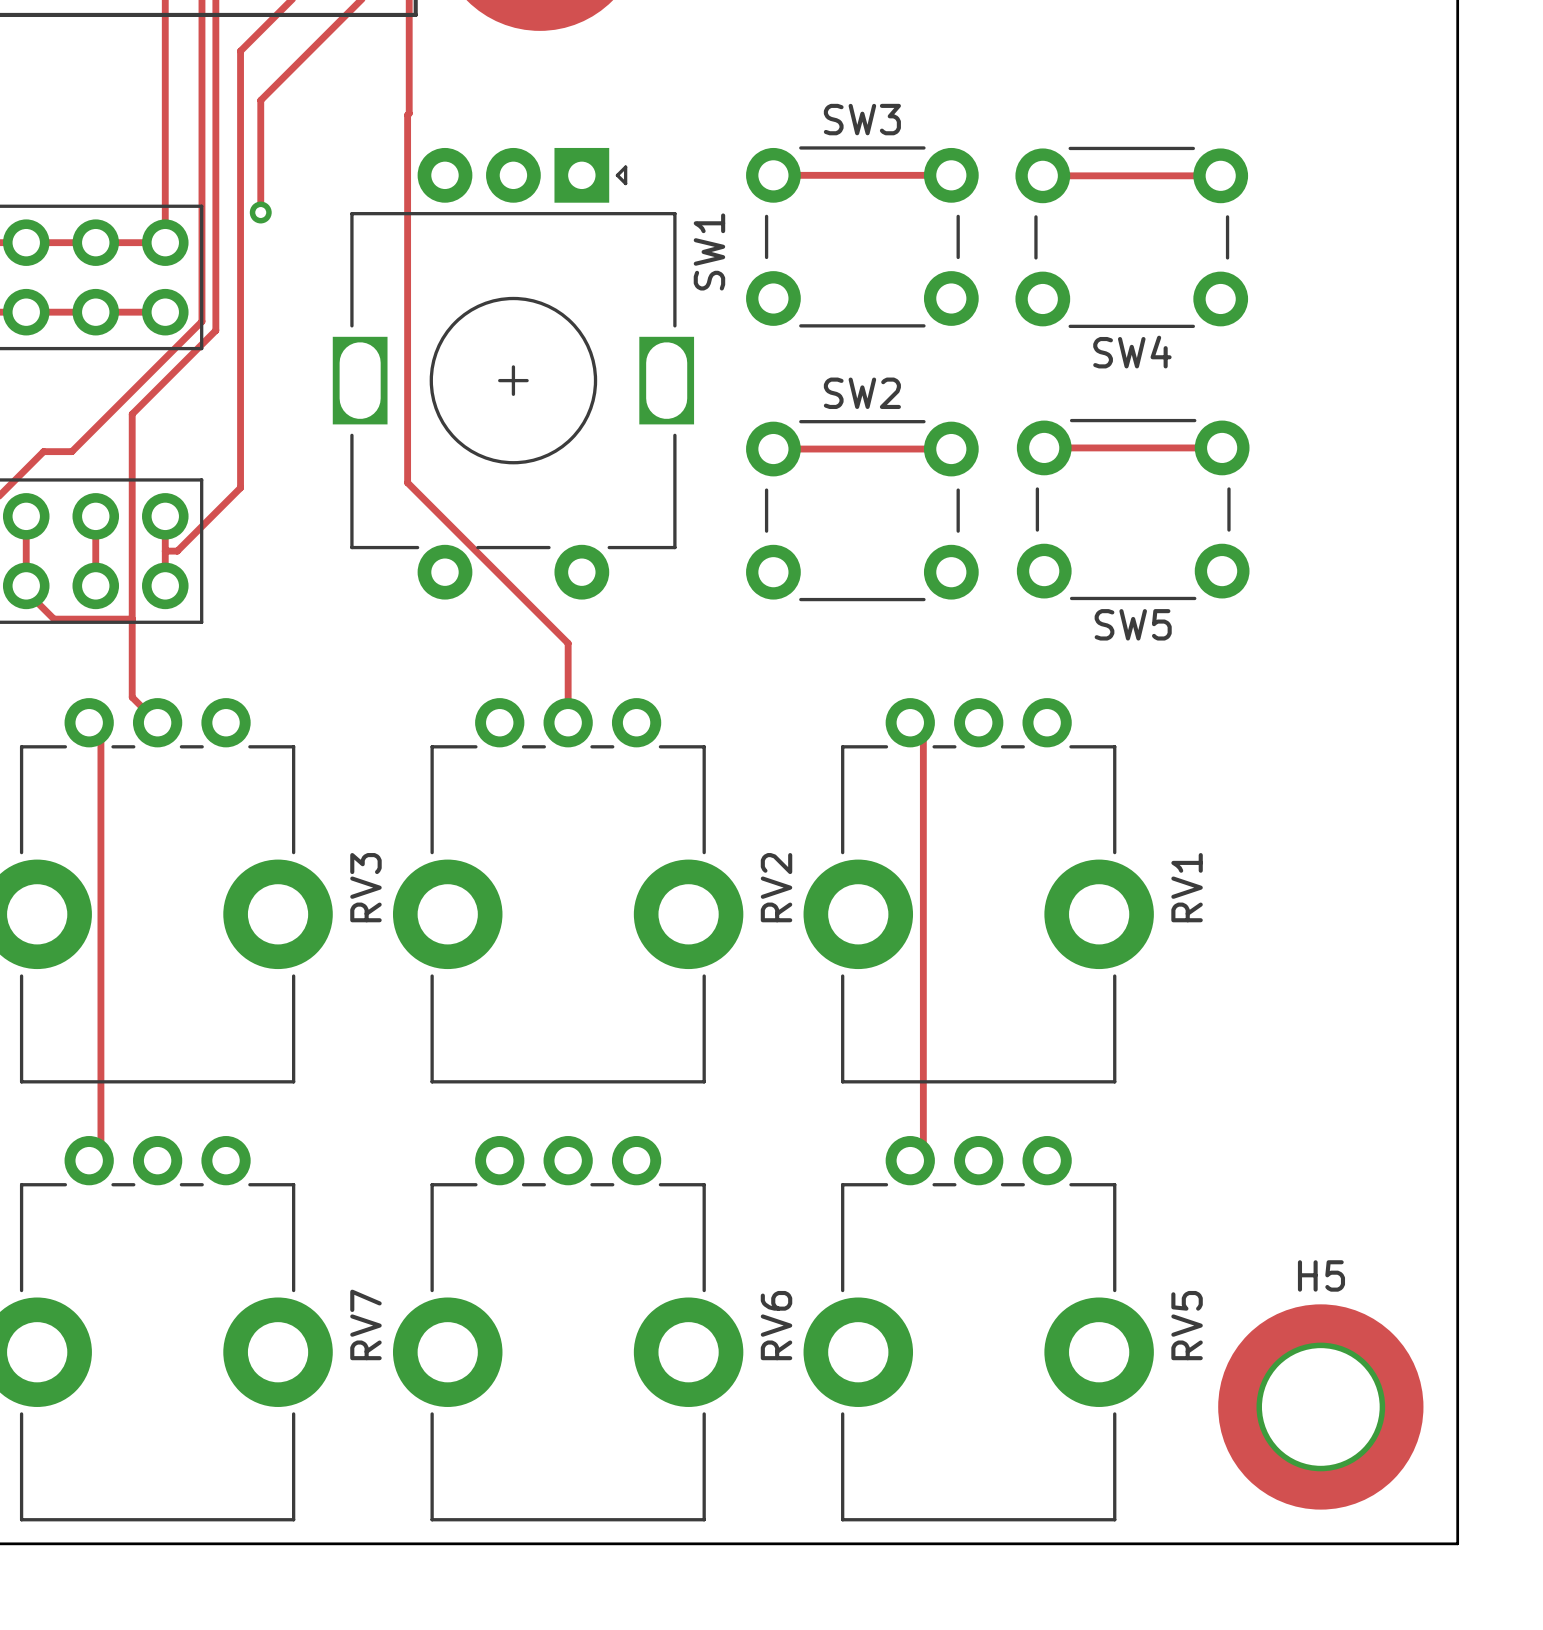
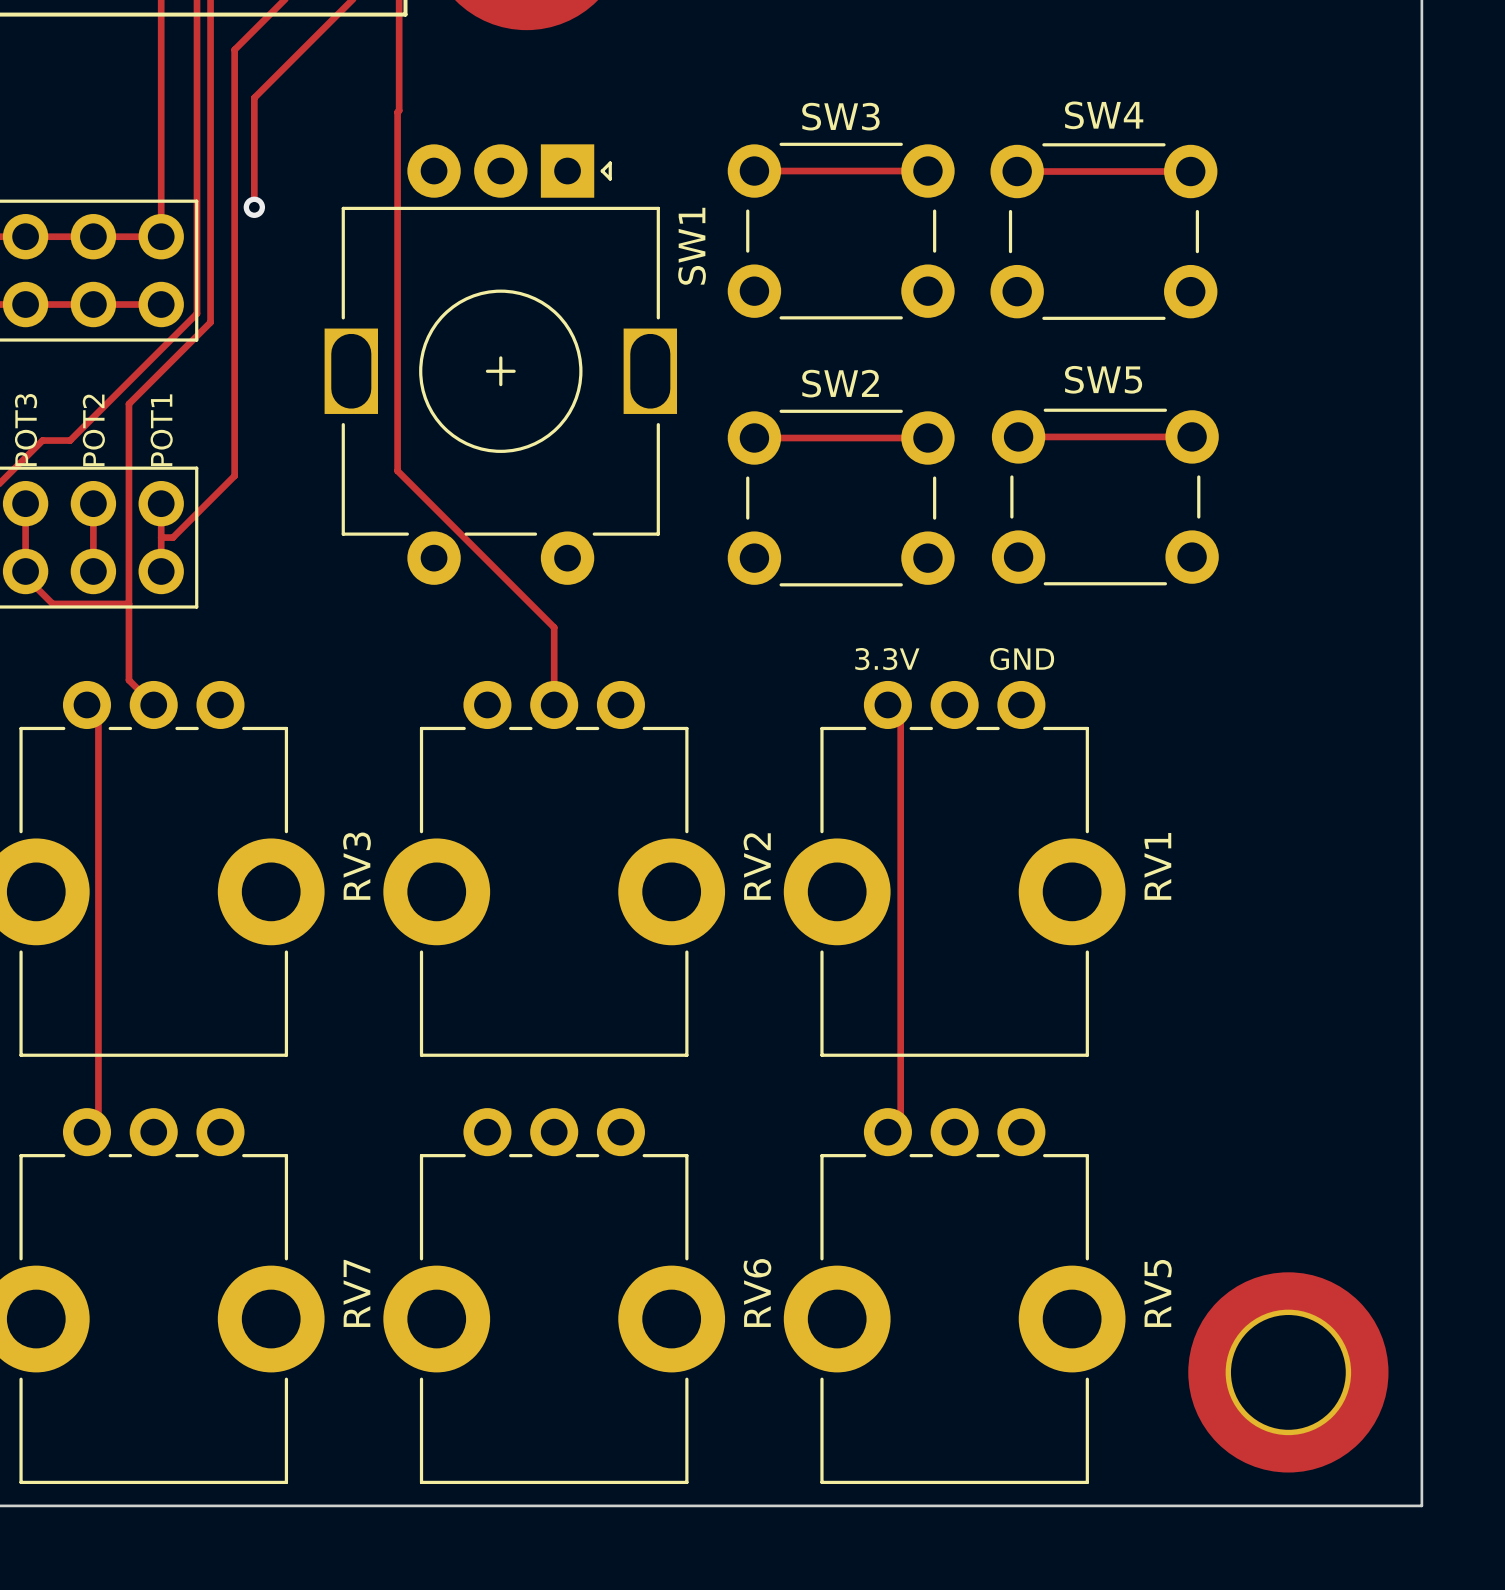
SW4 name position: SW4 (1132, 352) -> SW4 (1104, 115)
text: none -> POT3 (26, 430)
text: none -> POT2 (93, 430)
text: none -> POT1 (161, 430)
SW5 name position: SW5 (1133, 624) -> SW5 (1103, 379)
text: none -> 3.3V (887, 659)
text: none -> GND (1022, 659)
H5 name: H5 (1321, 1275) -> none

